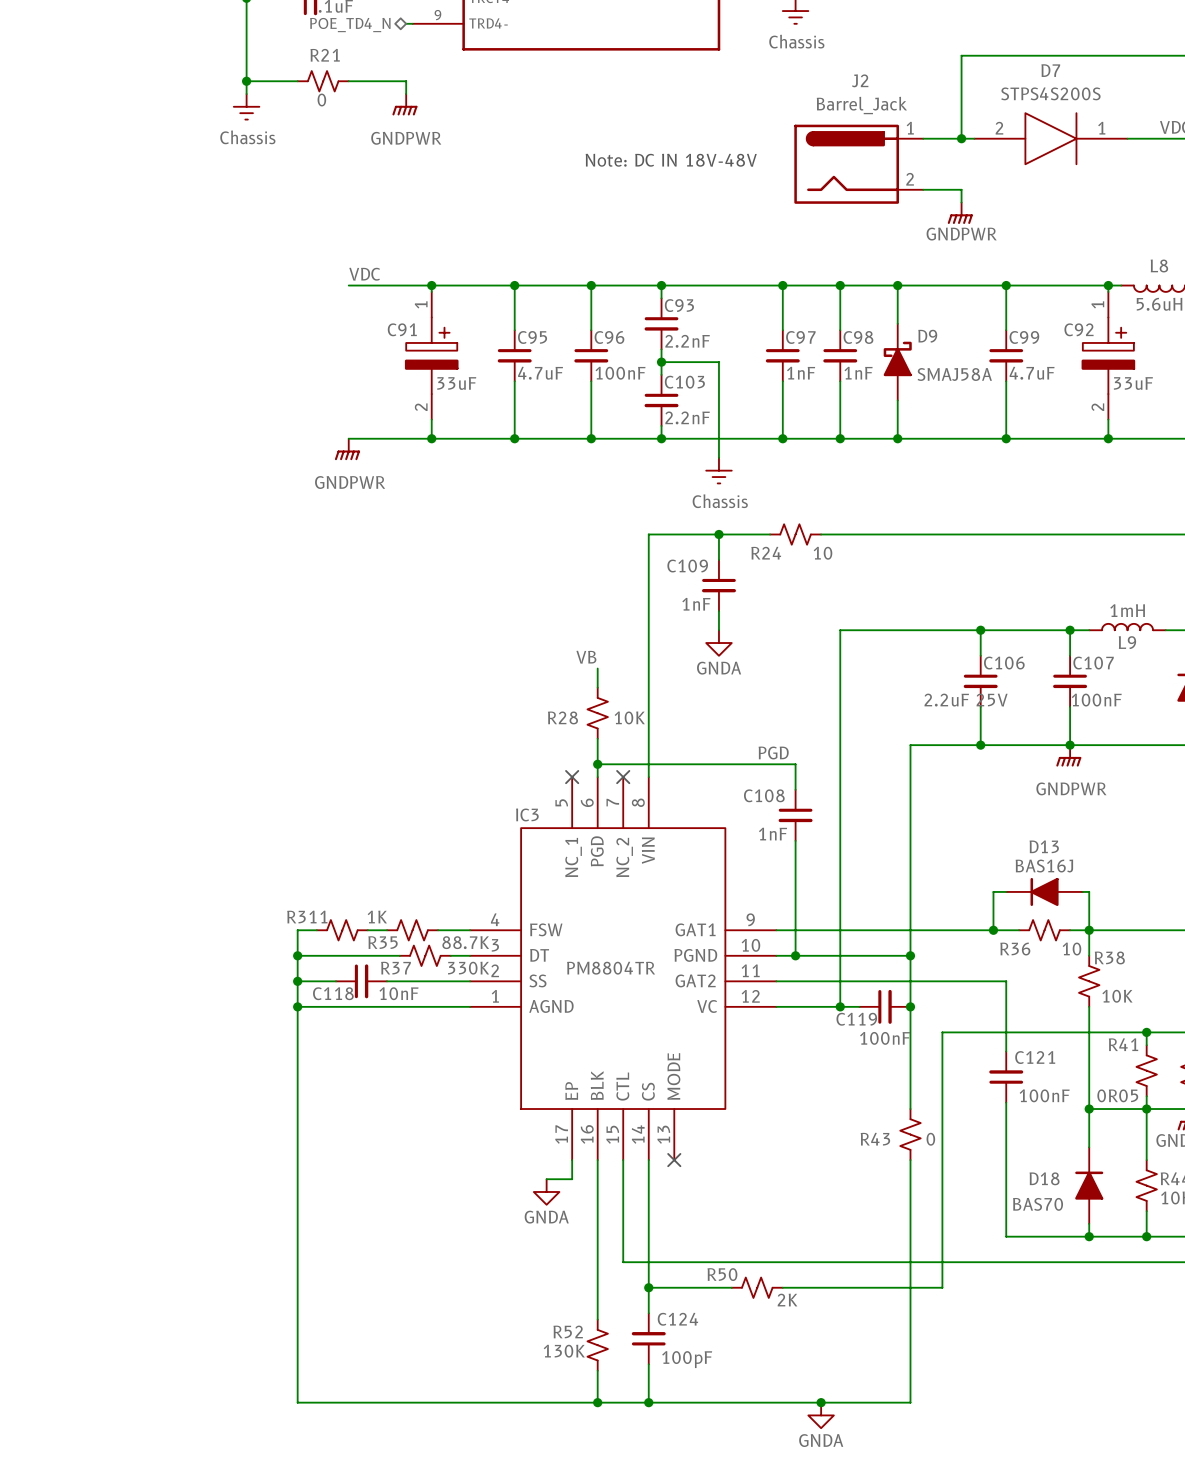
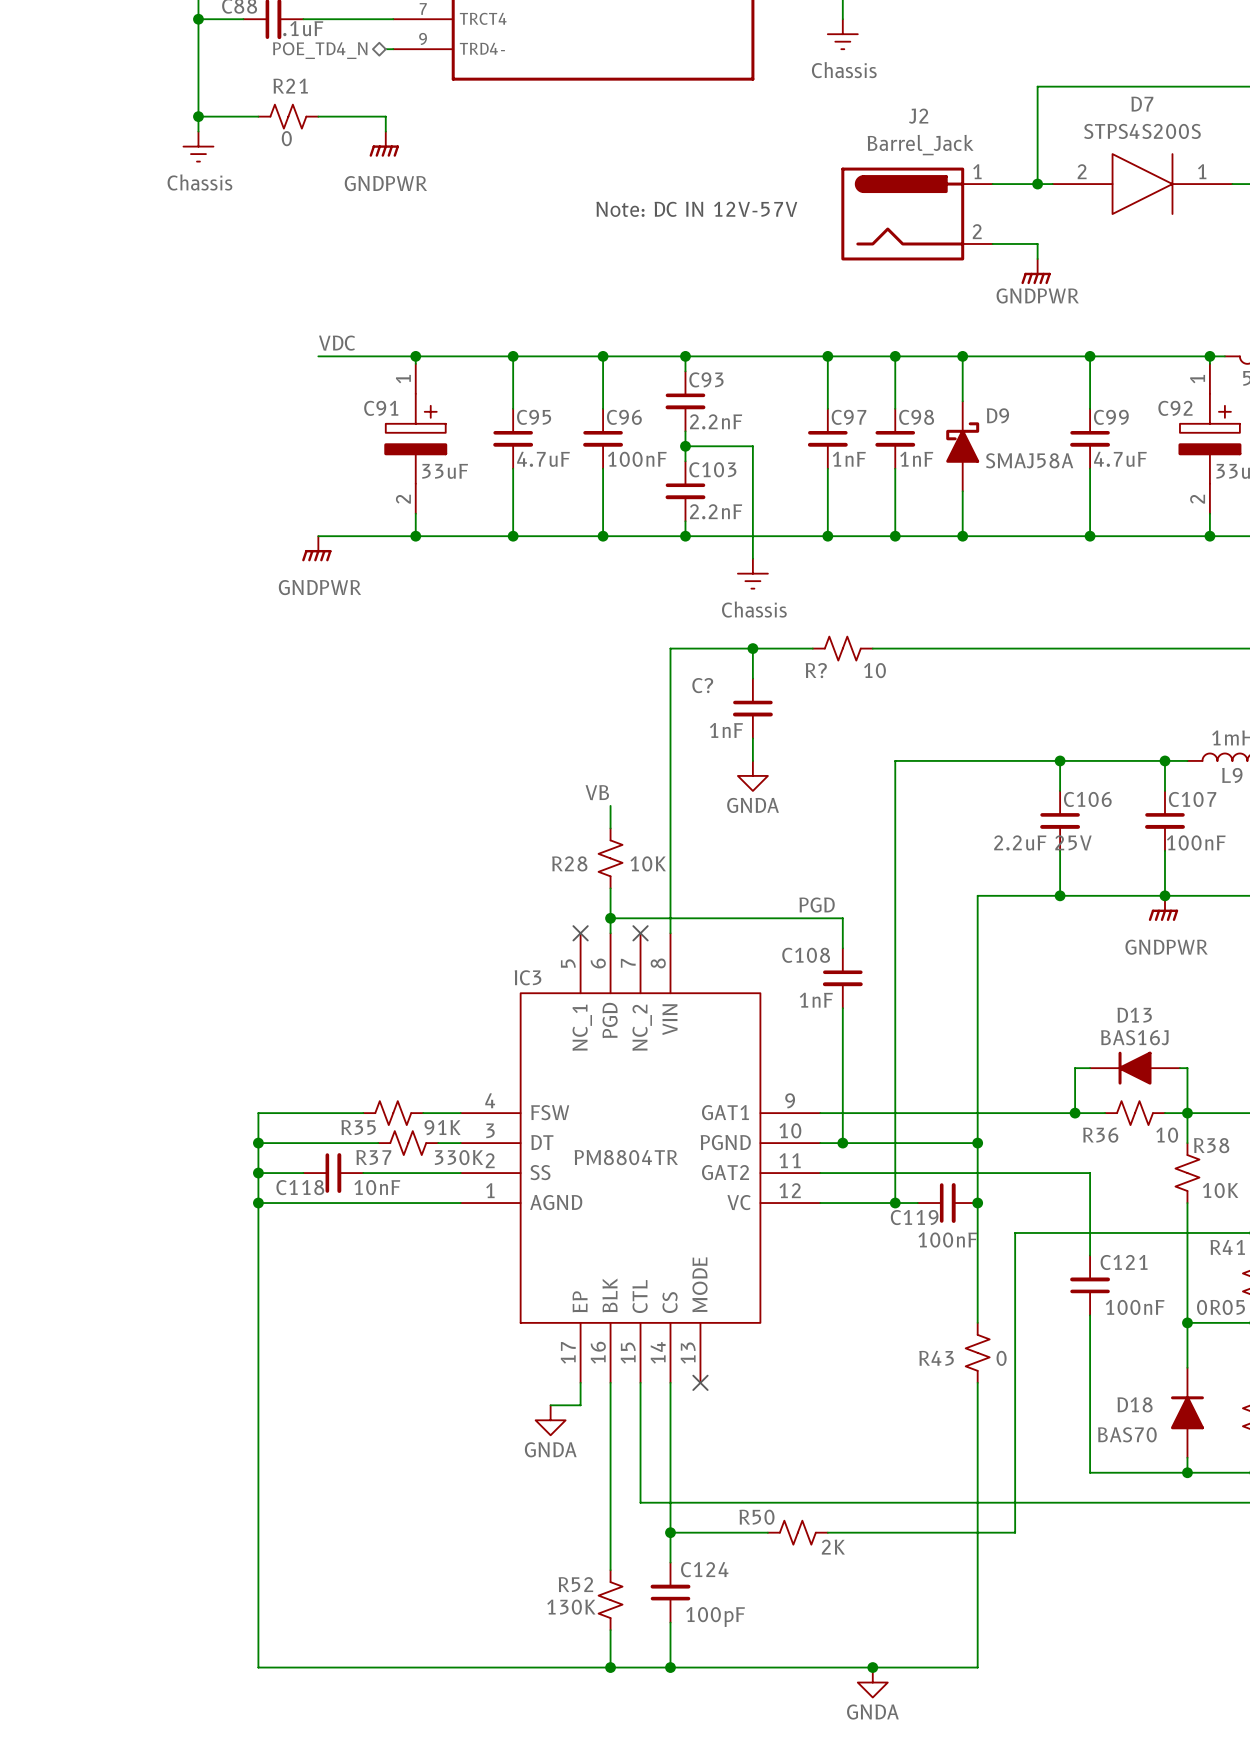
text: Note: DC IN 18V-48V (671, 160) -> Note: DC IN 12V-57V (696, 209)
R24 name: R24 (766, 553) -> R? (816, 670)
C109 name: C109 (687, 566) -> C? (702, 685)
R311: 1K (342, 930) -> none
R35 value: 88.7K (465, 942) -> 91K (442, 1127)

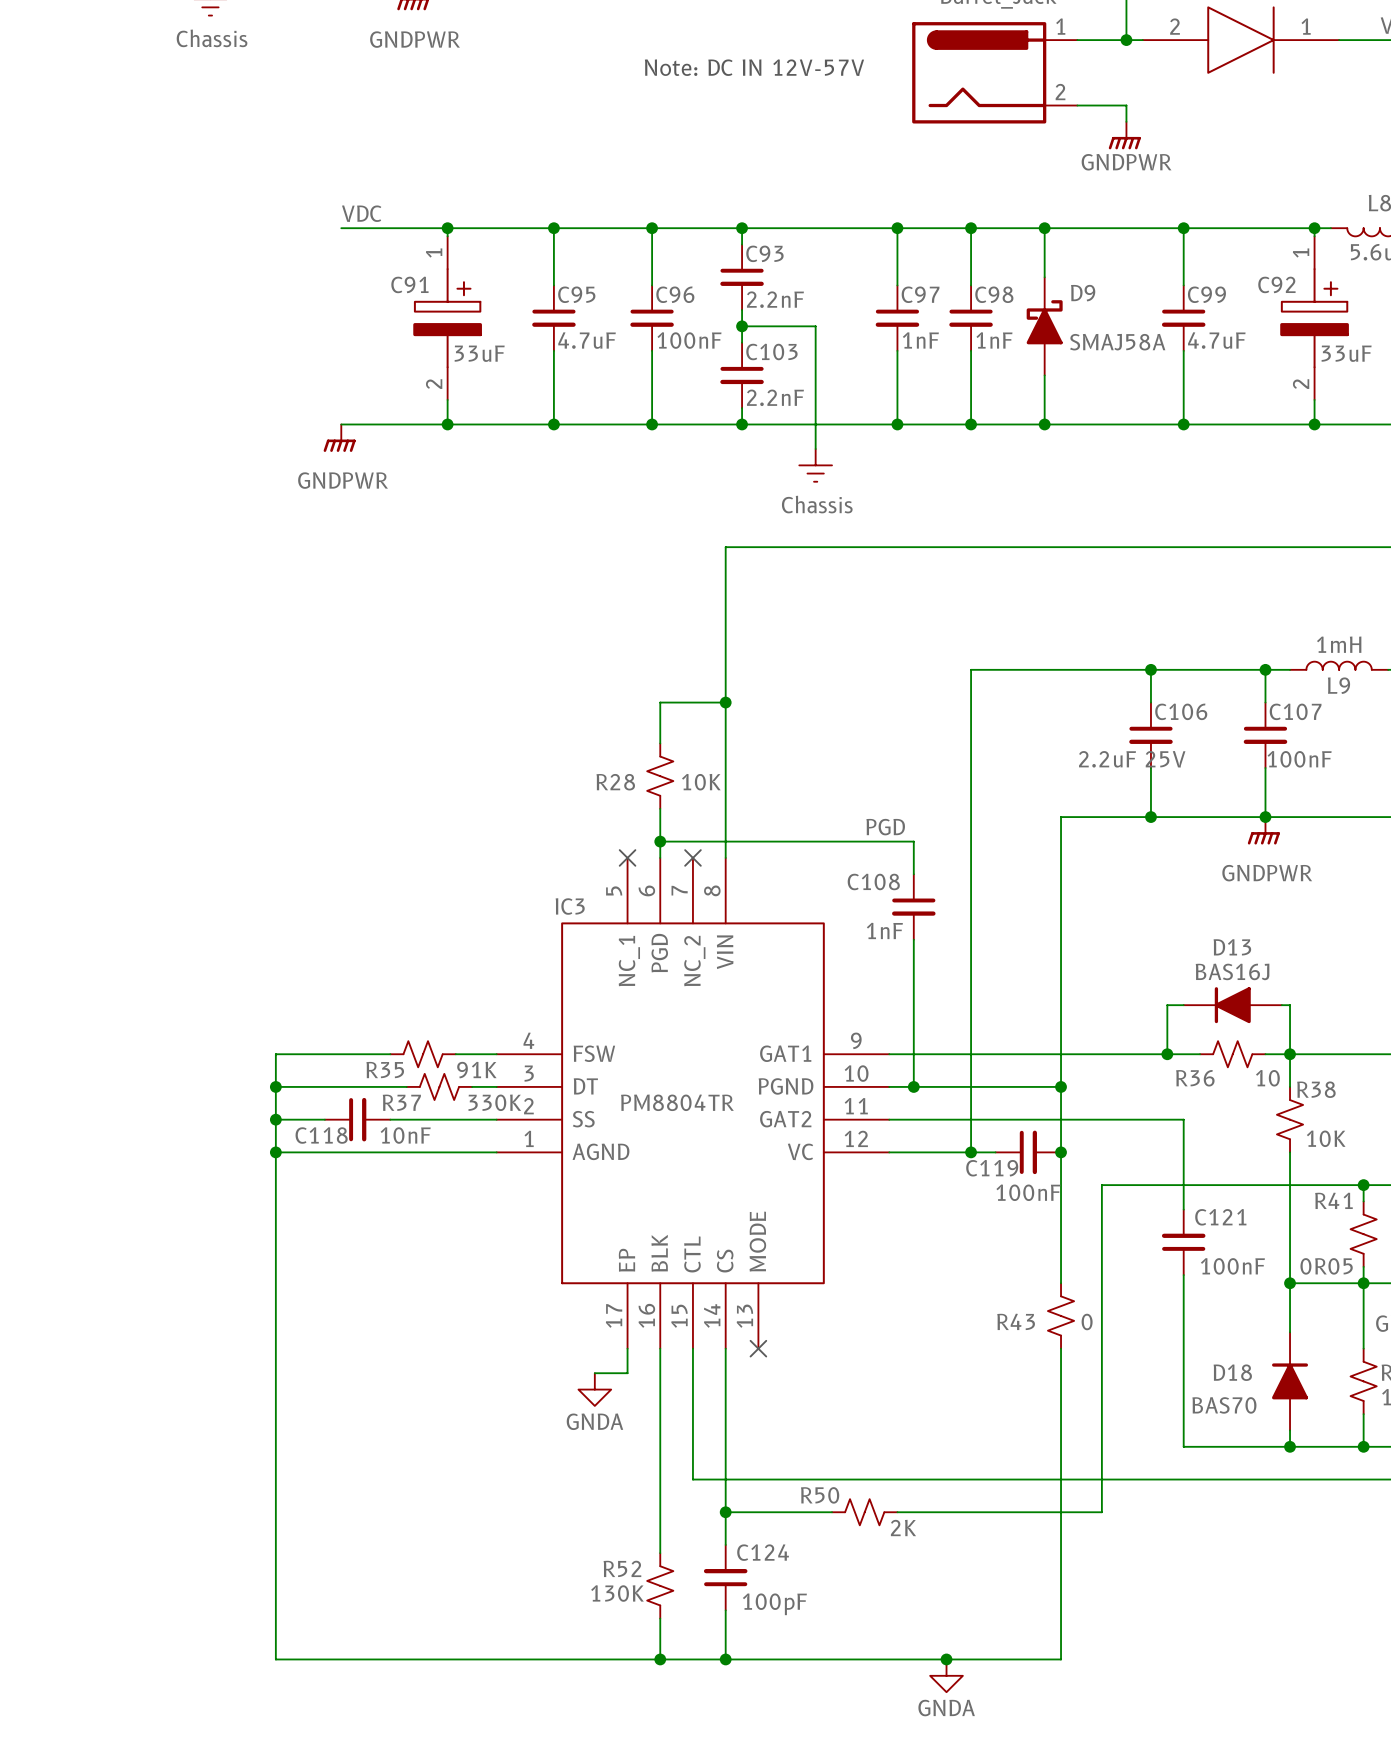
wire: (752, 648) (752, 678) -> none
junction: (752, 648) -> none
R?: 10 (842, 648) -> none
C?: 1nF (752, 708) -> none
wire: (752, 738) (752, 760) -> none
power symbol: GNDA (752, 775) -> none
wire: none -> (725, 702) (660, 702) (660, 718)
junction: none -> (725, 702)
label: VB (597, 792) -> none

